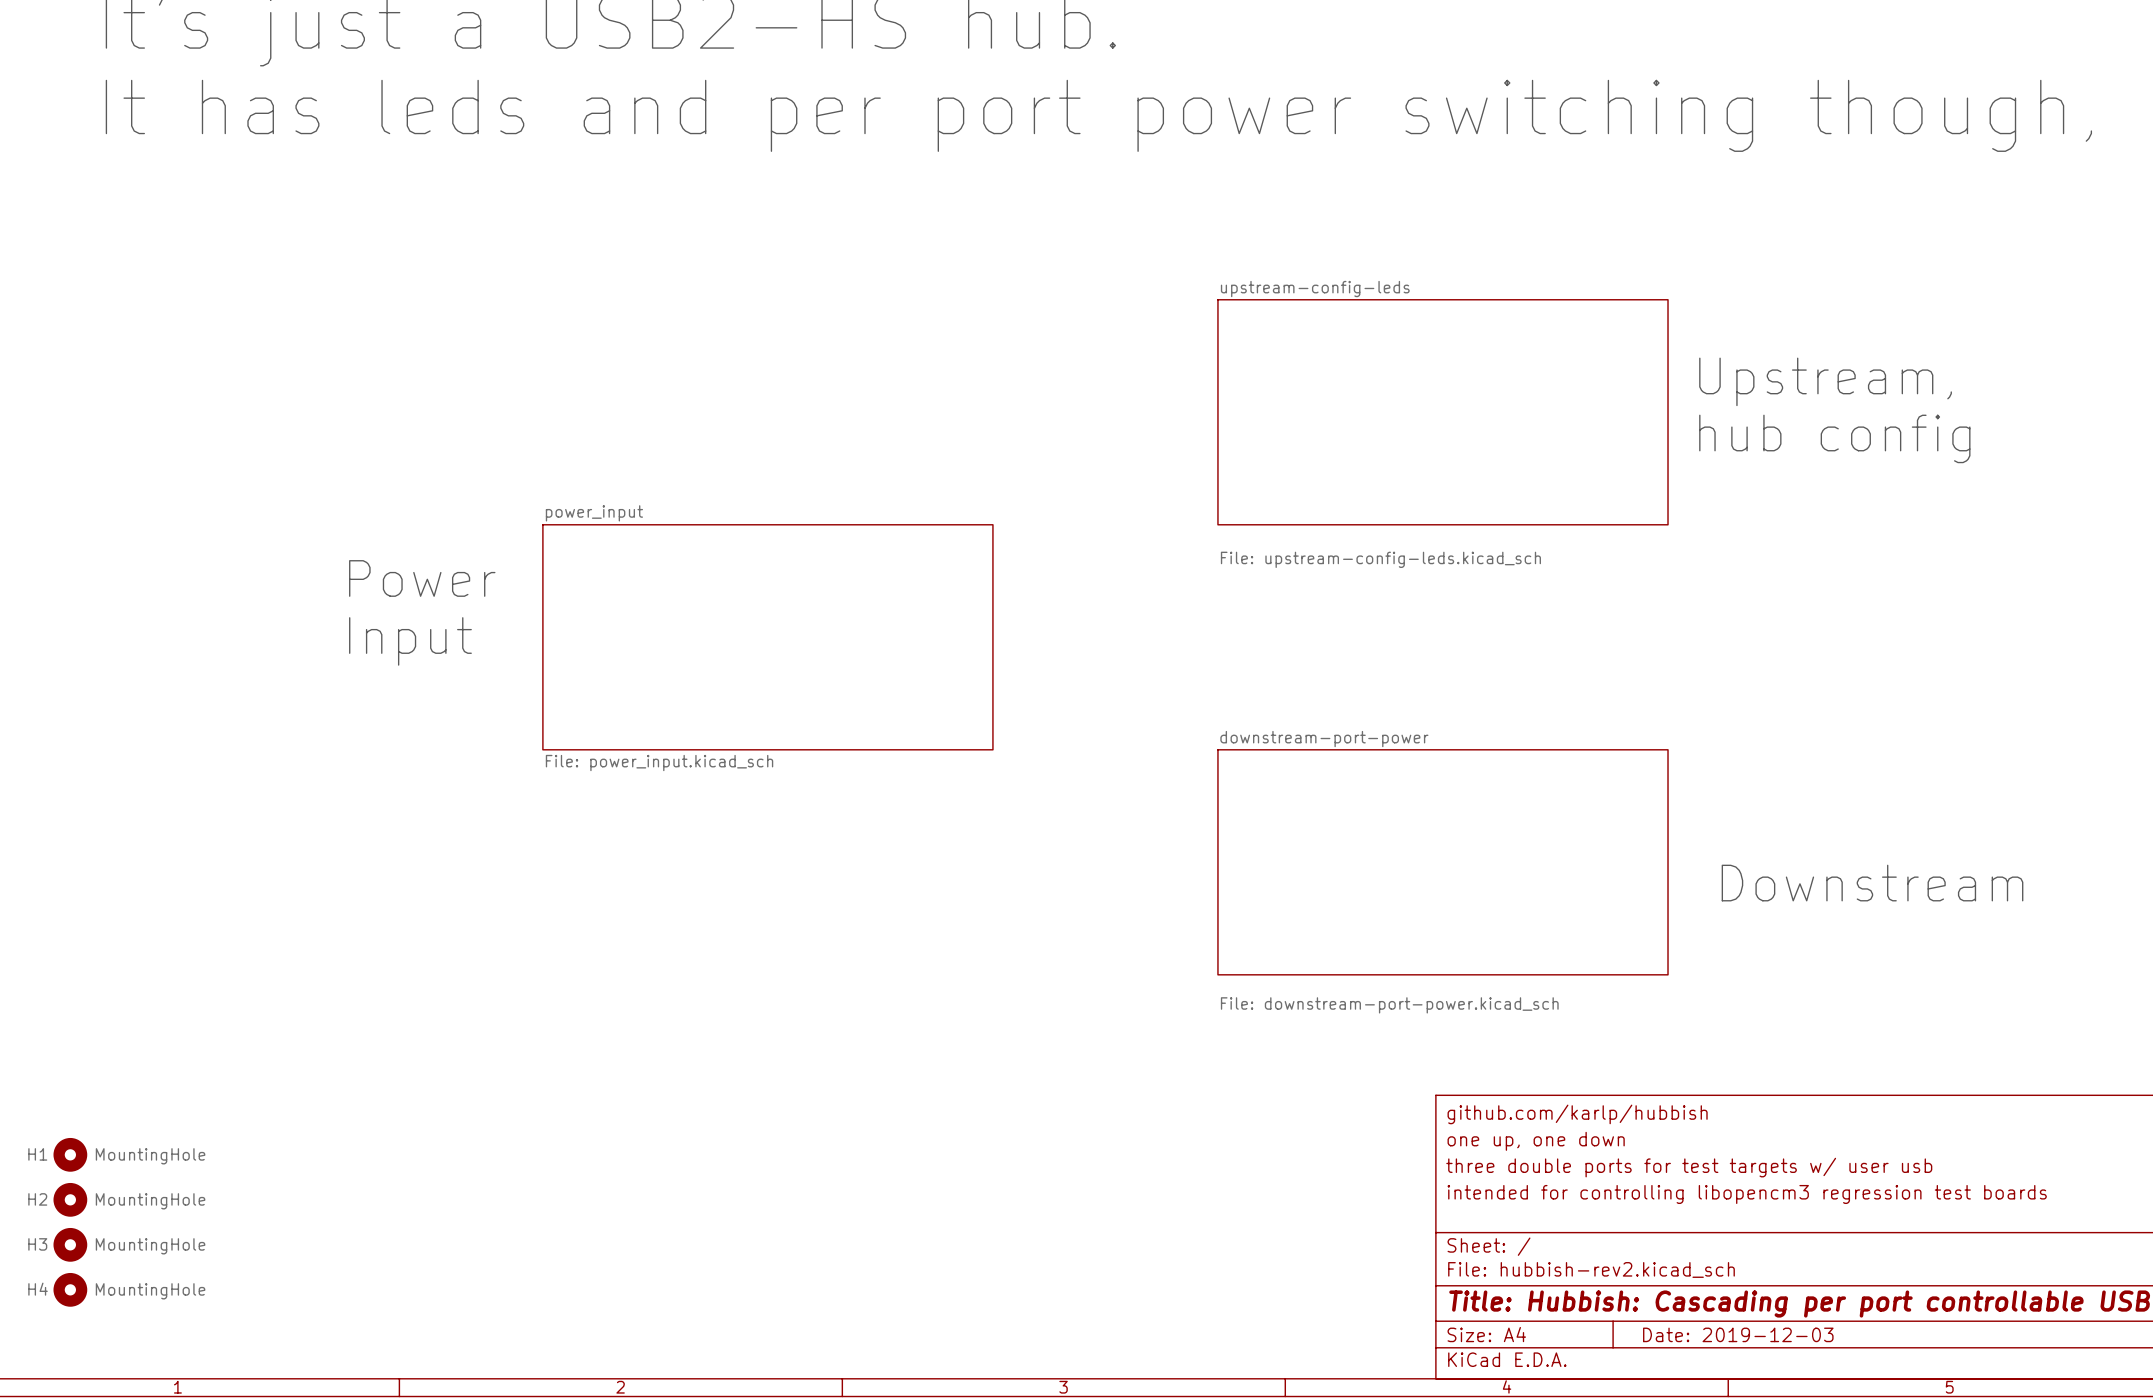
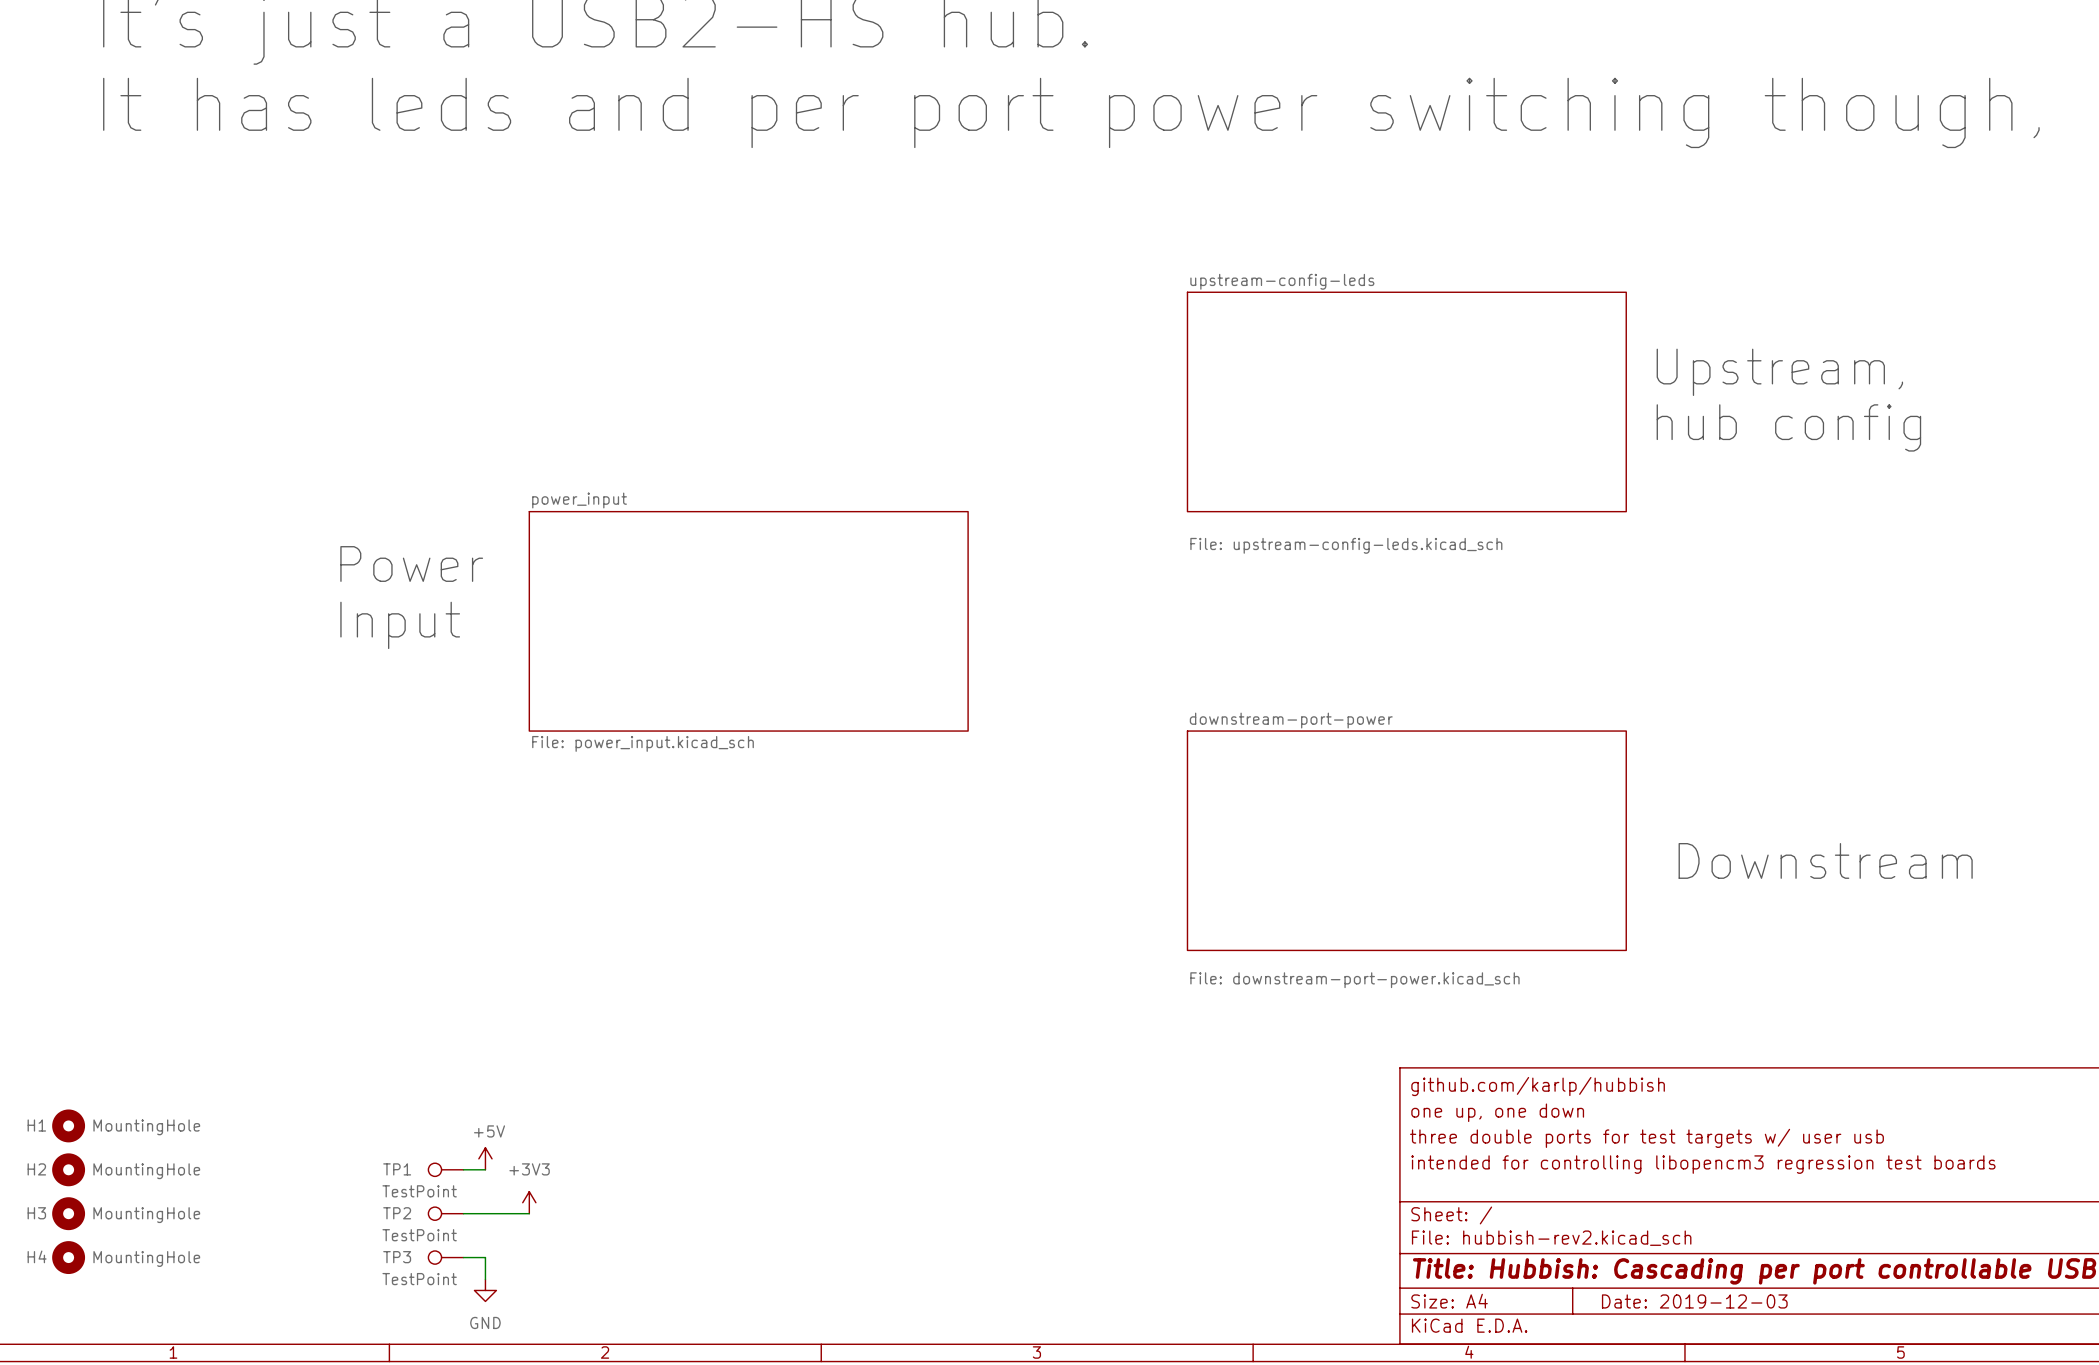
power symbol: none -> +5V (485, 1158)
TP1: none -> TestPoint (445, 1169)
wire: none -> (463, 1169) (485, 1169)
power symbol: none -> +3V3 (529, 1202)
TP2: none -> TestPoint (445, 1213)
wire: none -> (463, 1213) (529, 1213)
TP3: none -> TestPoint (445, 1257)
wire: none -> (463, 1257) (485, 1257) (485, 1279)
power symbol: none -> GND (485, 1290)

